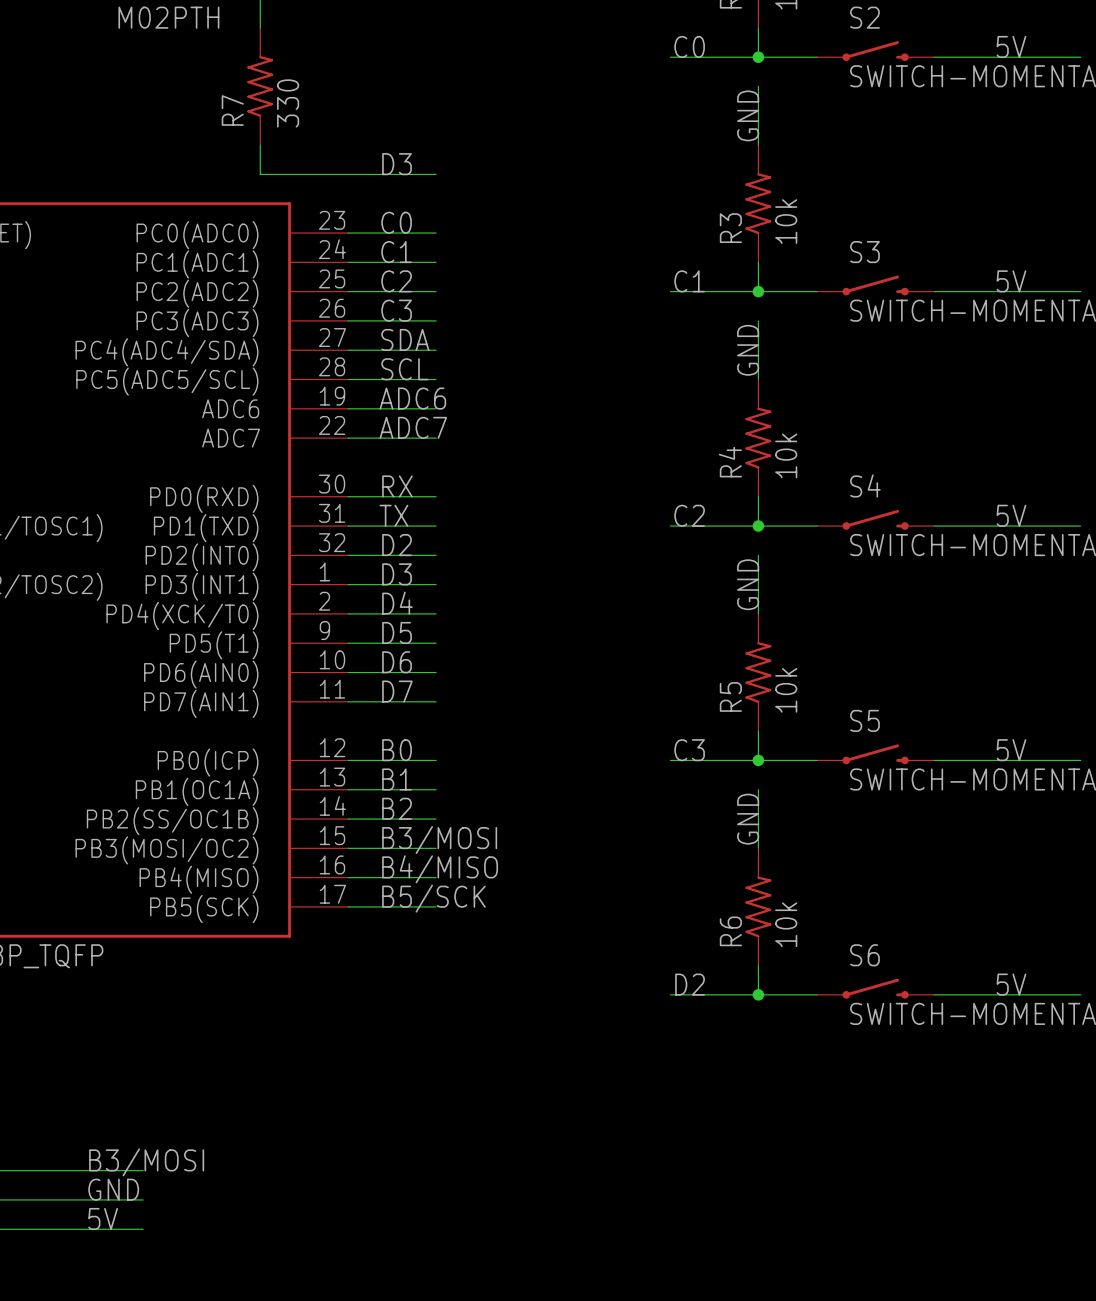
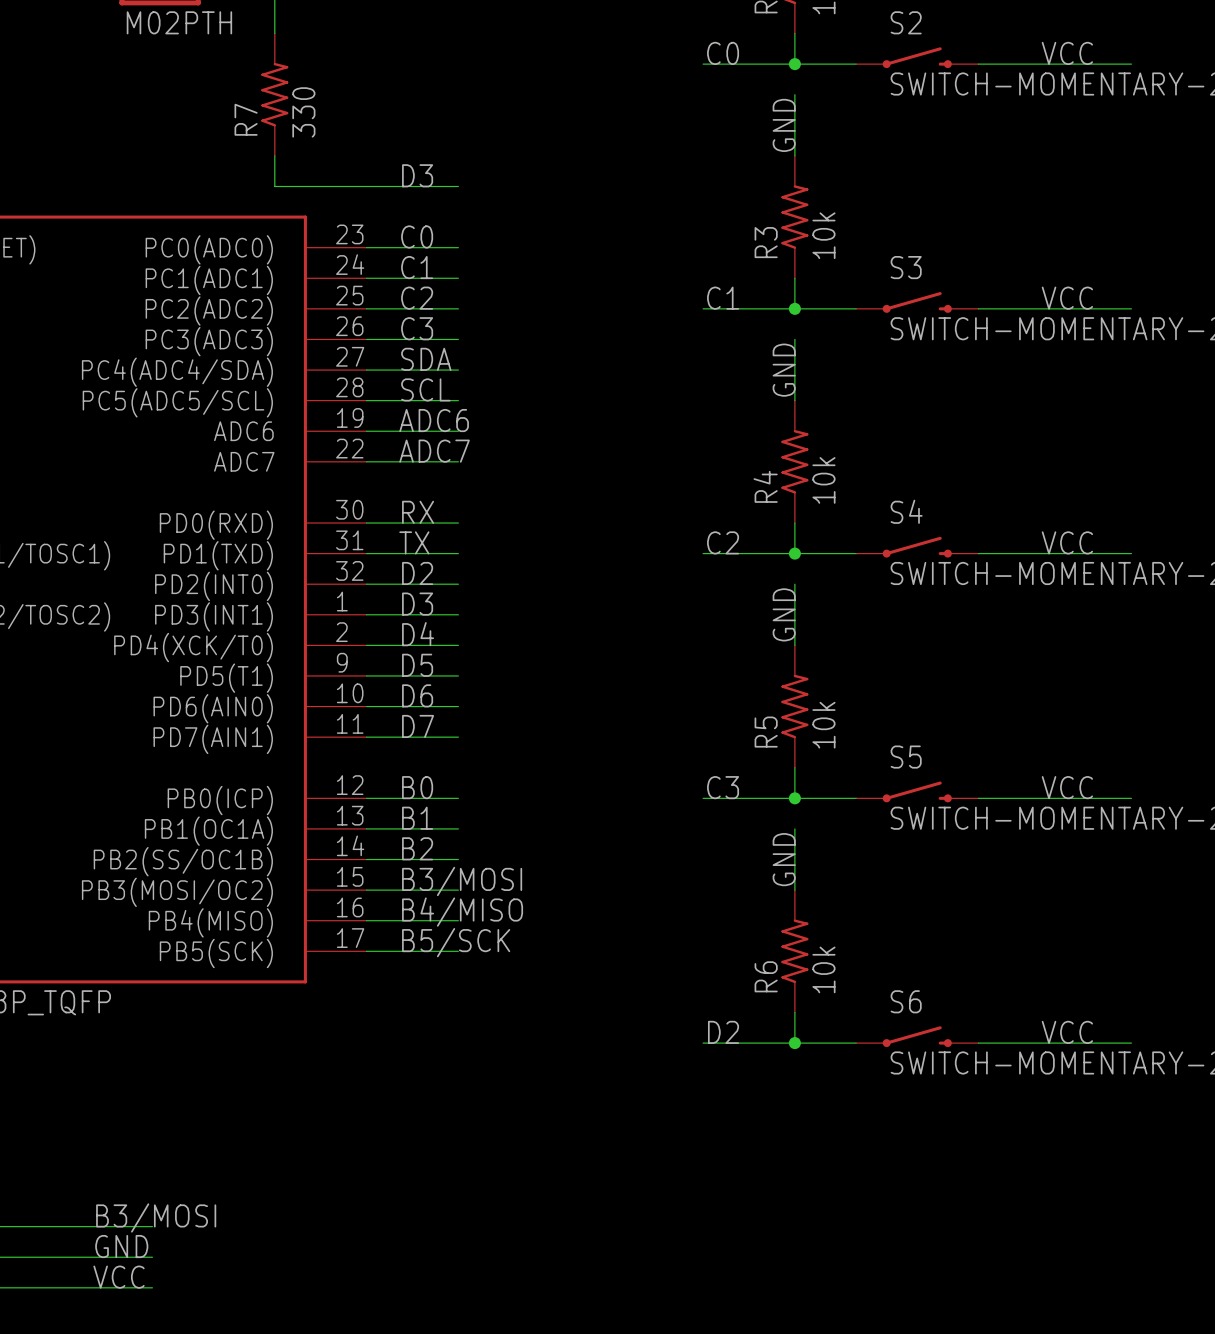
label: 5V (1011, 46) -> VCC (1067, 53)
label: 5V (1011, 281) -> VCC (1067, 298)
label: 5V (1011, 515) -> VCC (1067, 542)
label: 5V (1011, 750) -> VCC (1067, 787)
label: 5V (1011, 984) -> VCC (1067, 1032)
label: 5V (103, 1219) -> VCC (119, 1277)

